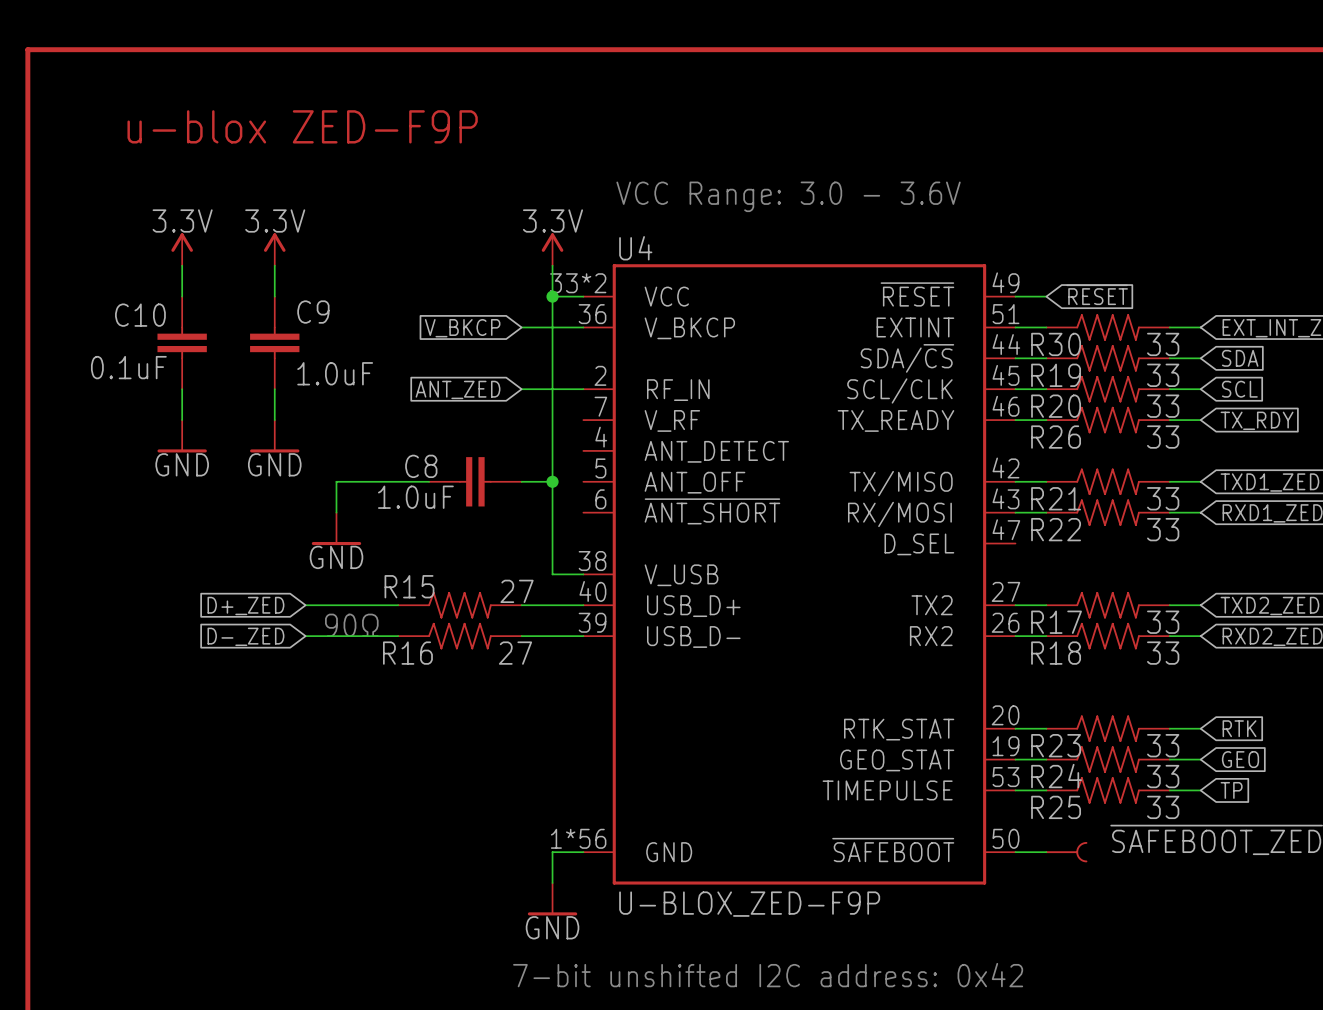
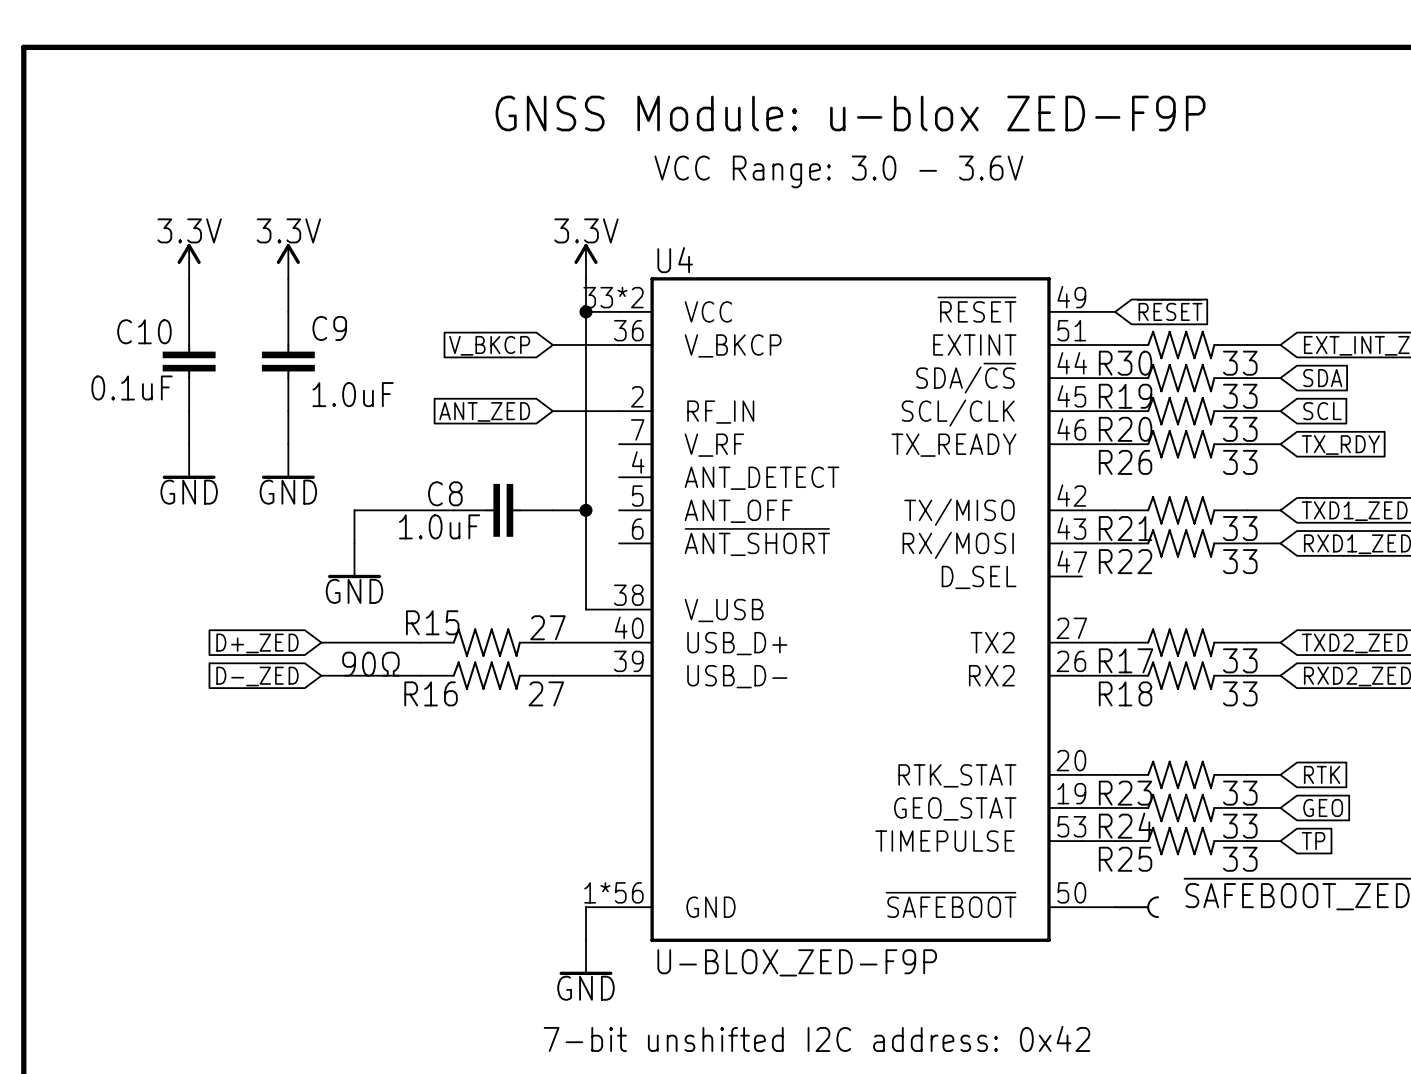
text: none -> GNSS Module: u-blox ZED-F9P (850, 113)
text: u-blox ZED-F9P (302, 126) -> none
text position: VCC Range: 3.0 - 3.6V (788, 196) -> VCC Range: 3.0 - 3.6V (838, 171)

